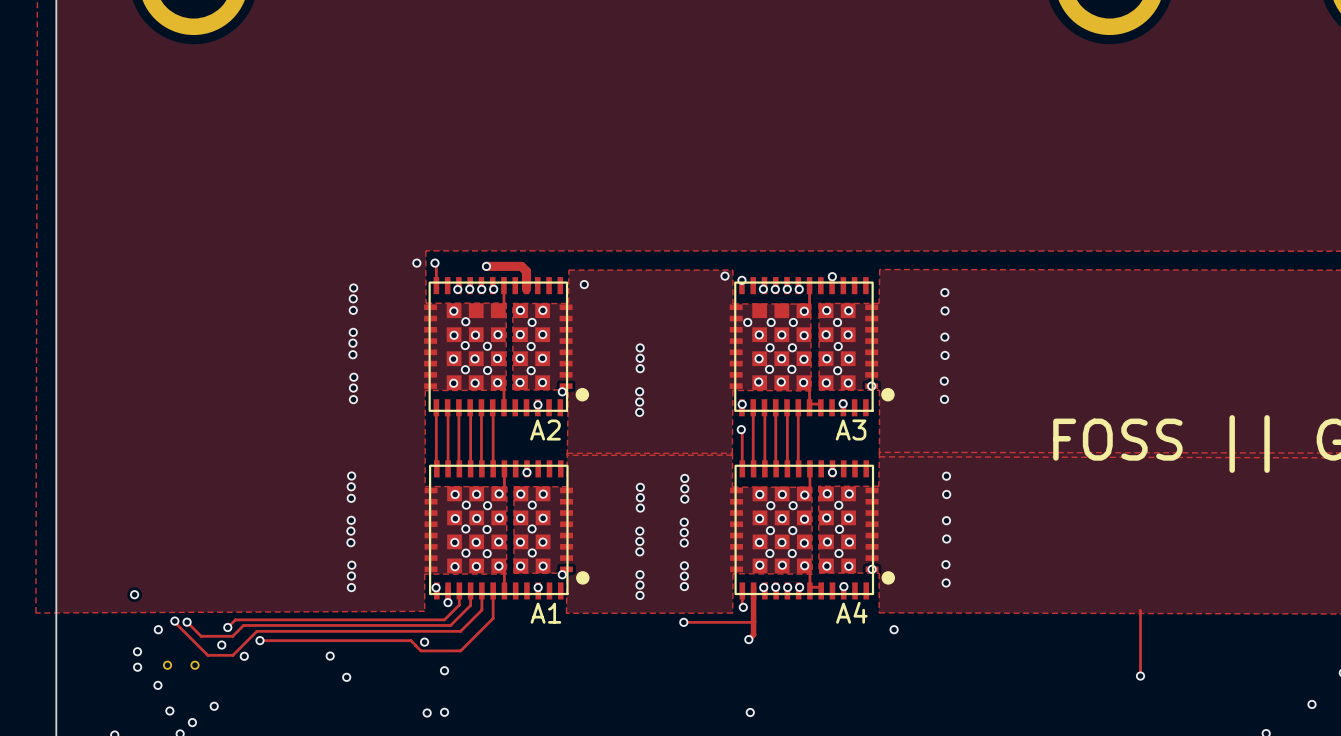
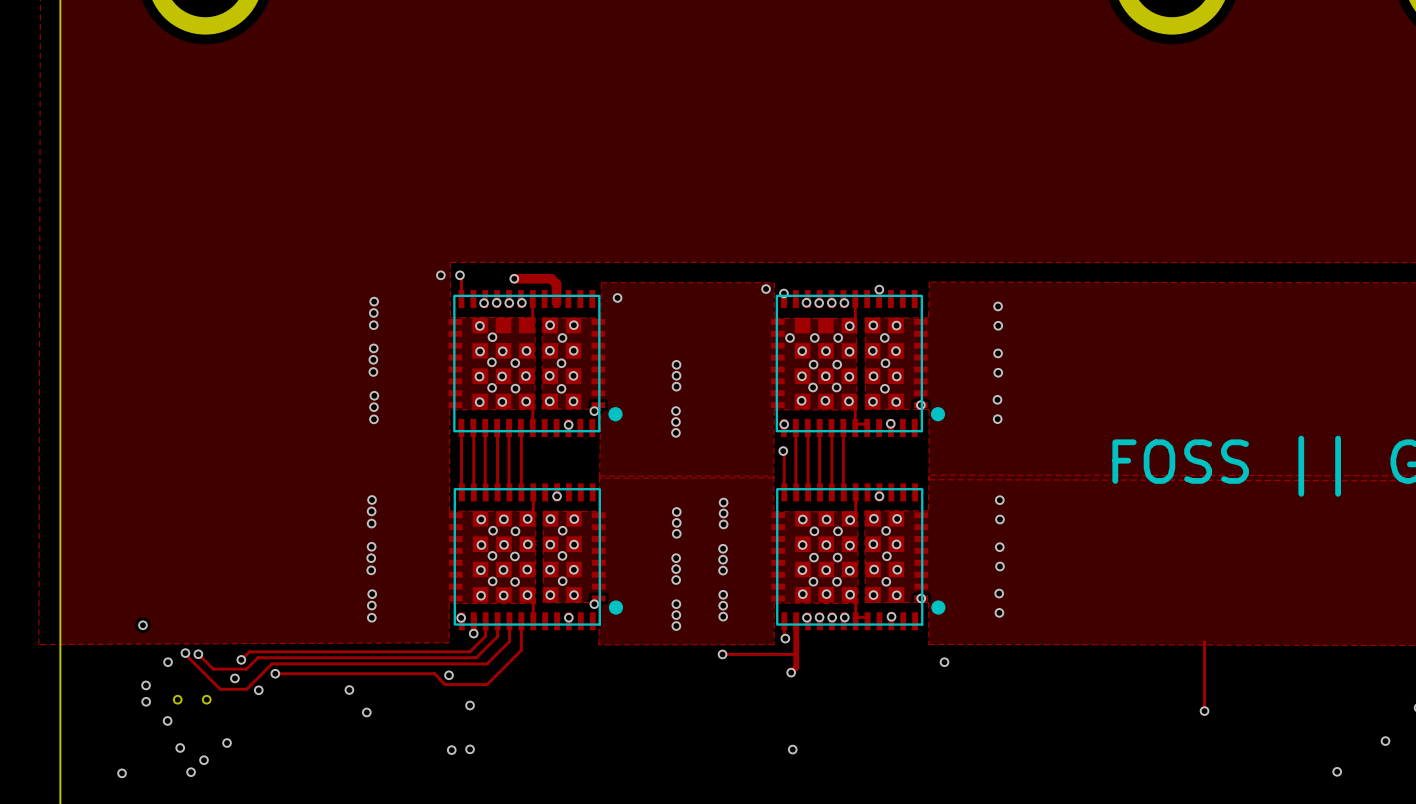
A2 name: A2 (545, 430) -> none
A3 name: A3 (851, 430) -> none
A4 name: A4 (851, 612) -> none
A1 name: A1 (545, 613) -> none

